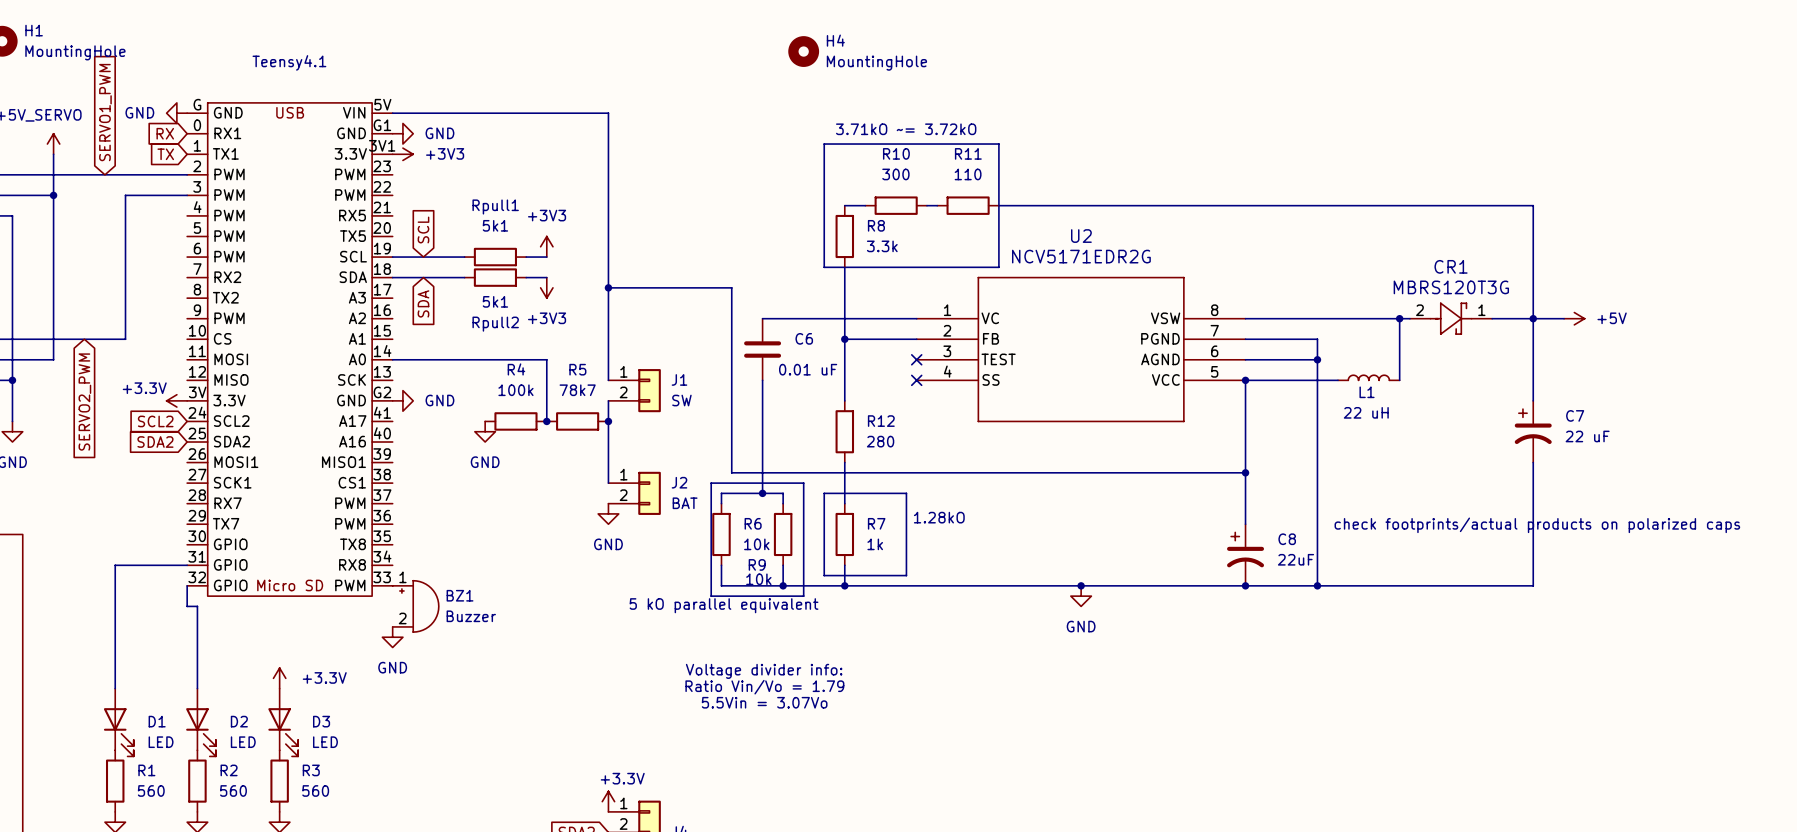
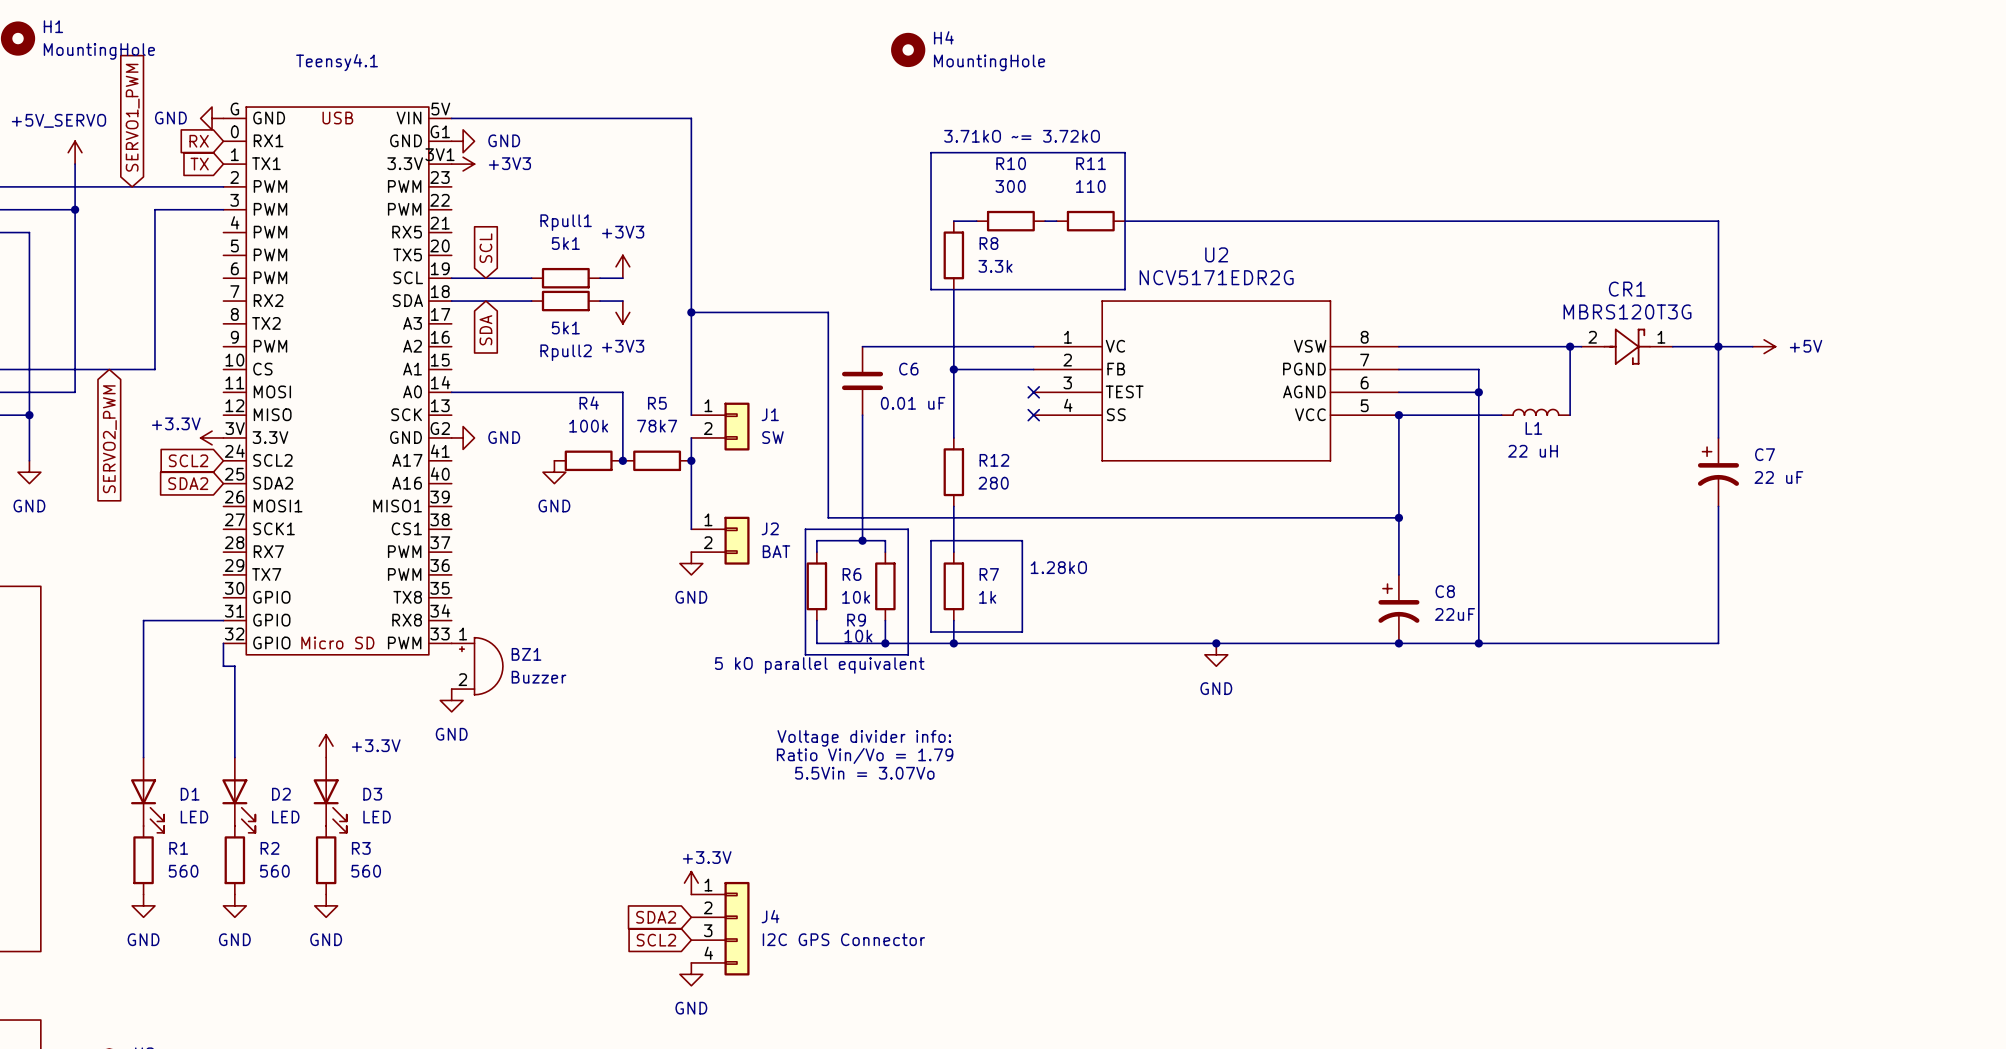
text: check footprints/actual products on polarized caps (1537, 525) -> none

